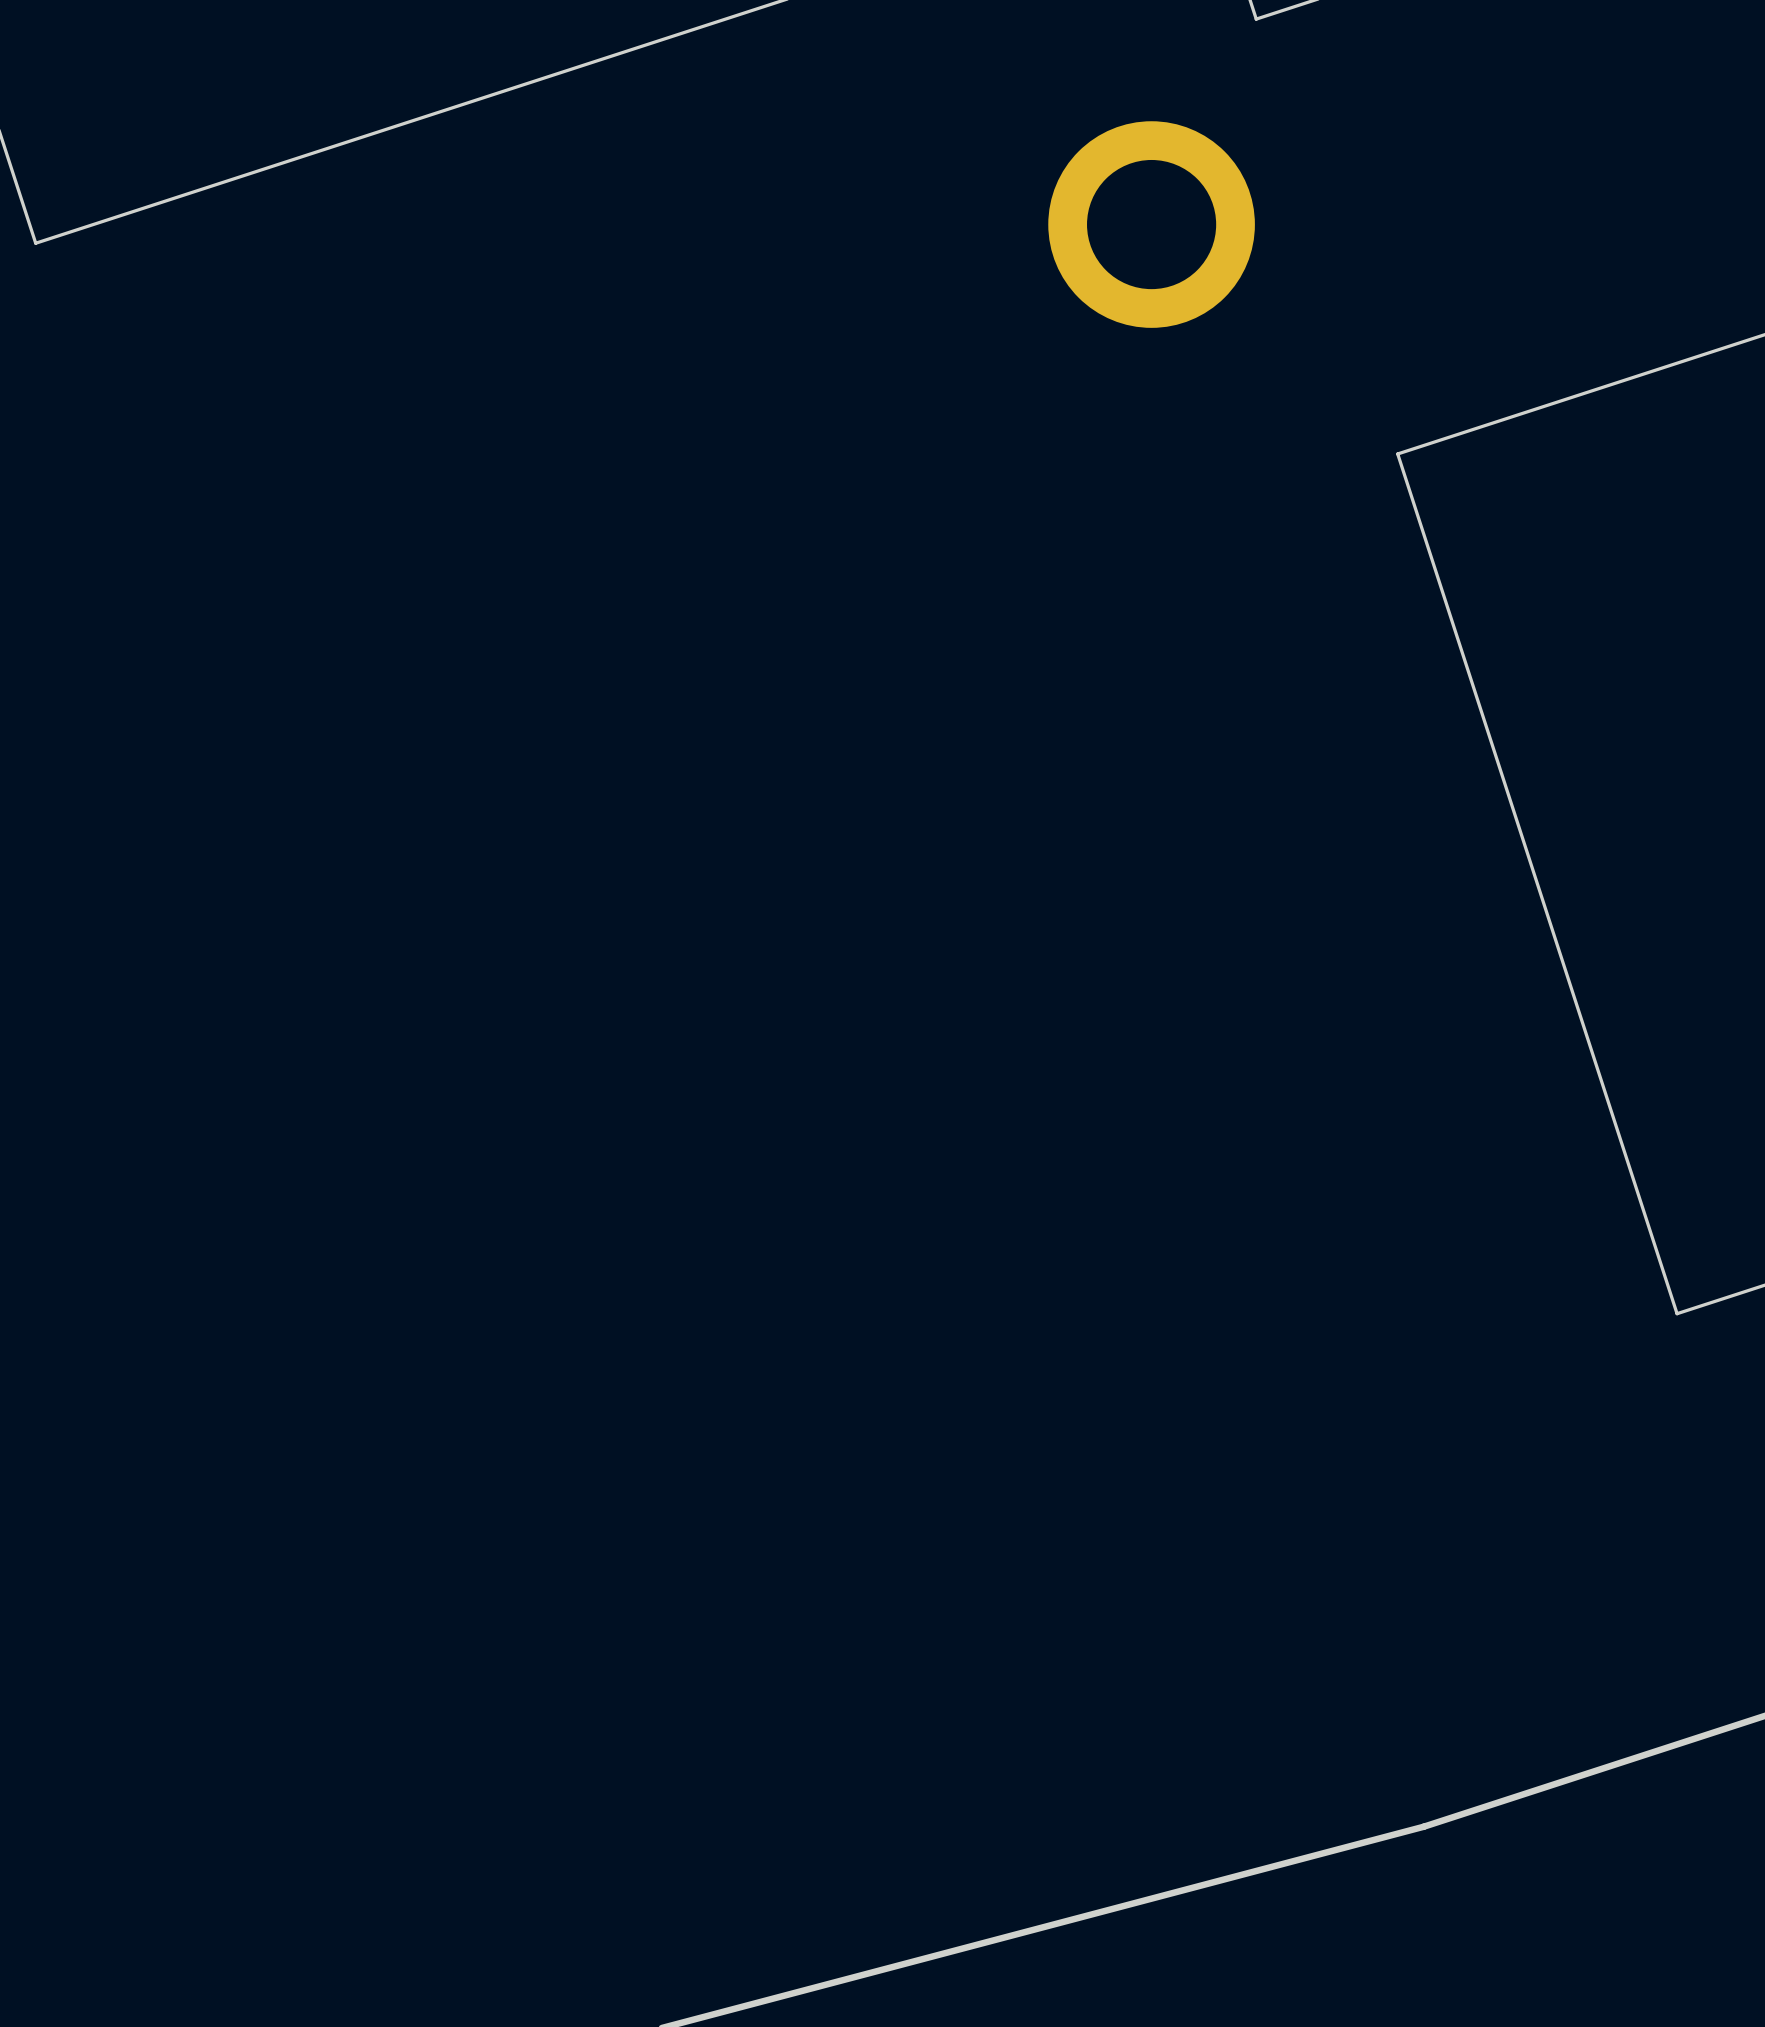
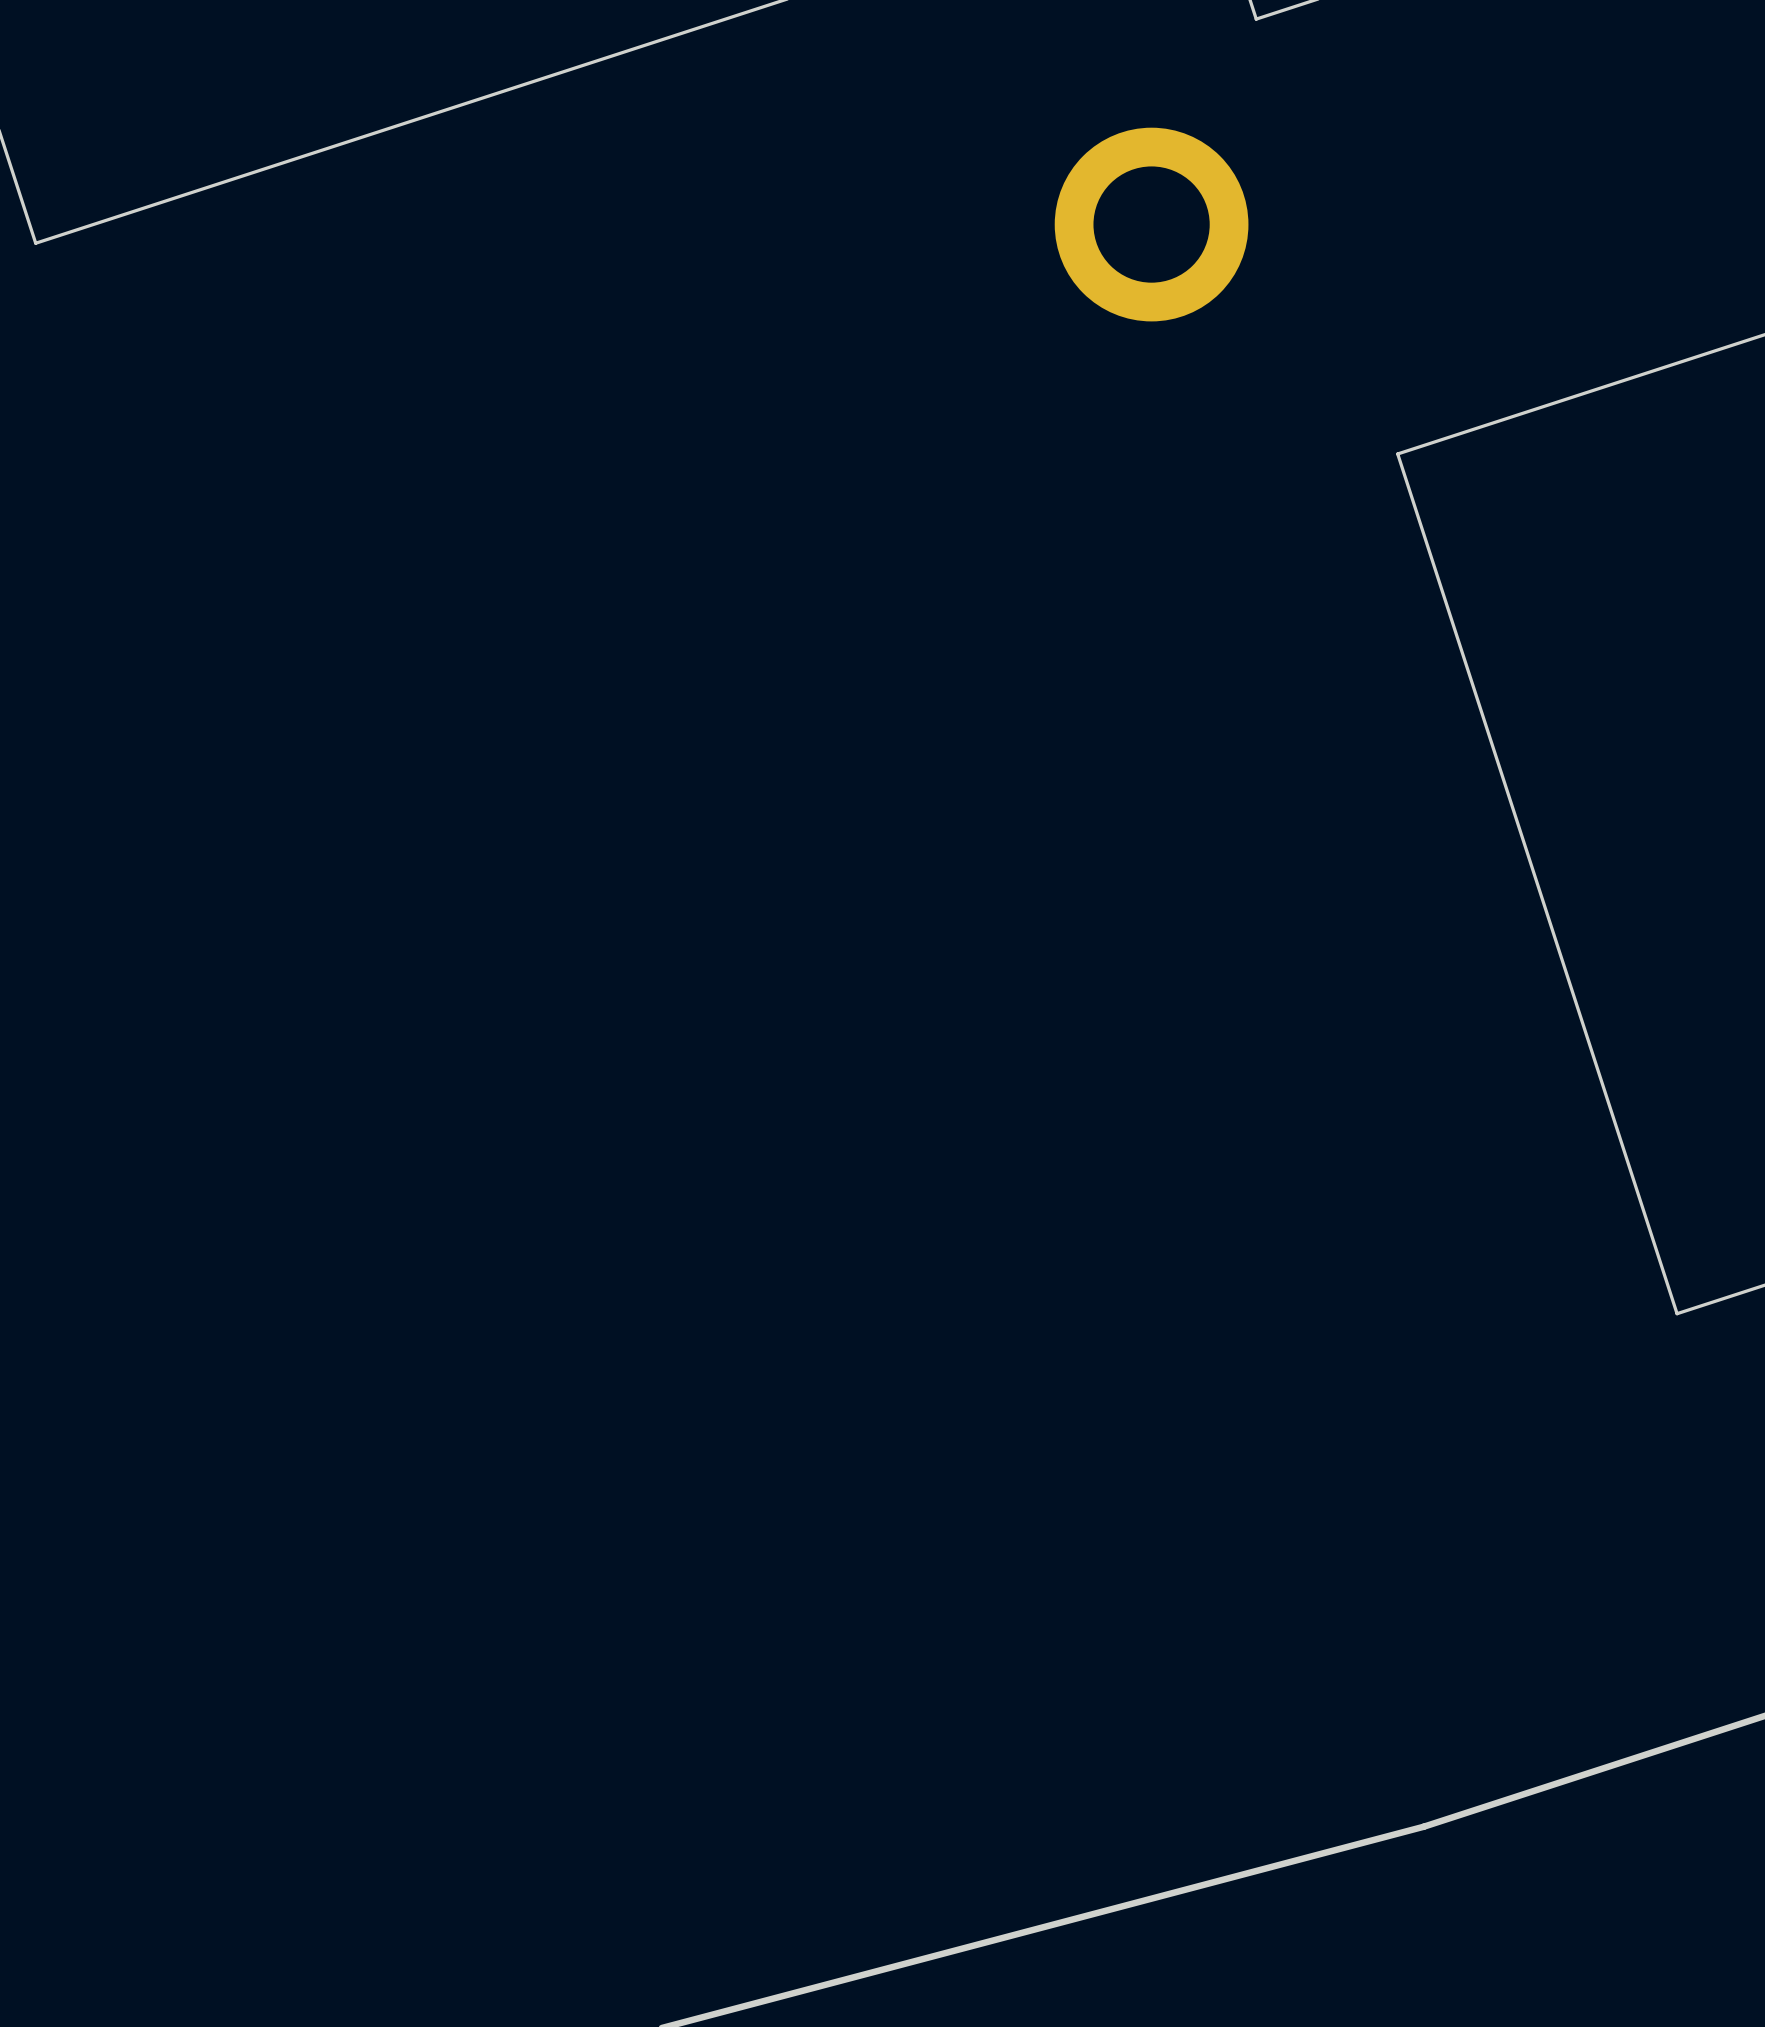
part footprint: [1048, 121, 1255, 328] -> [1054, 127, 1249, 322]

